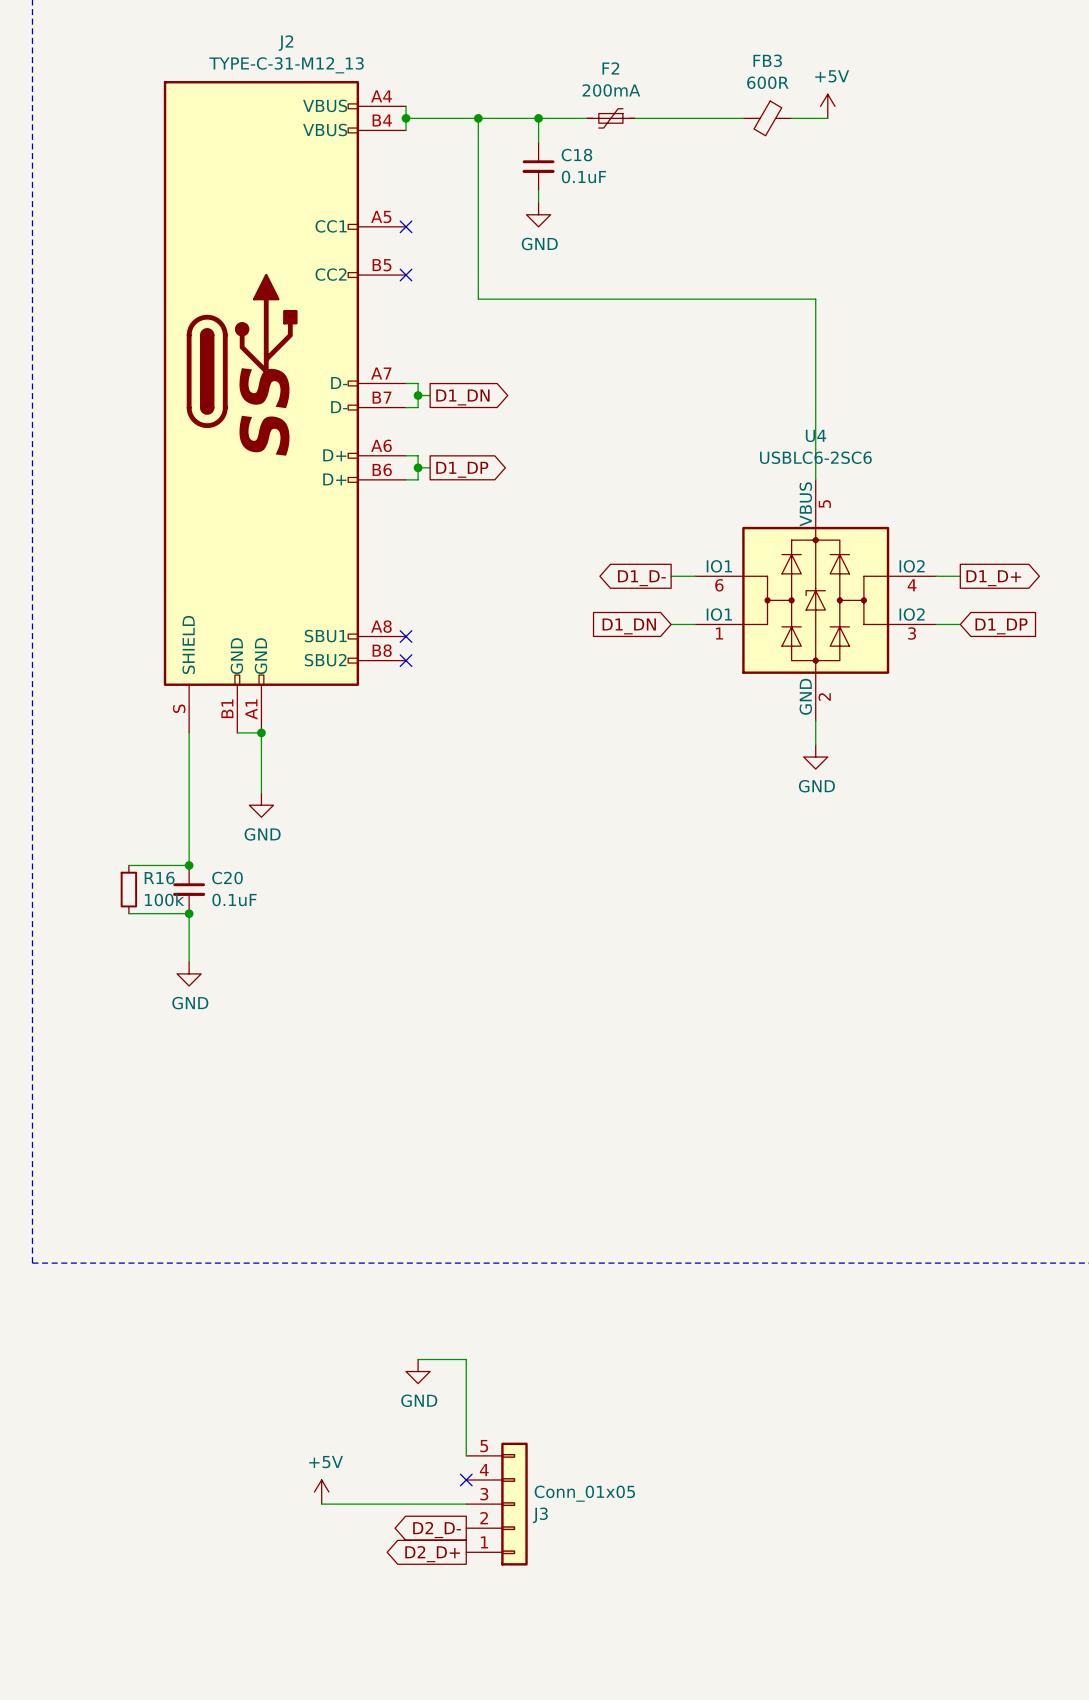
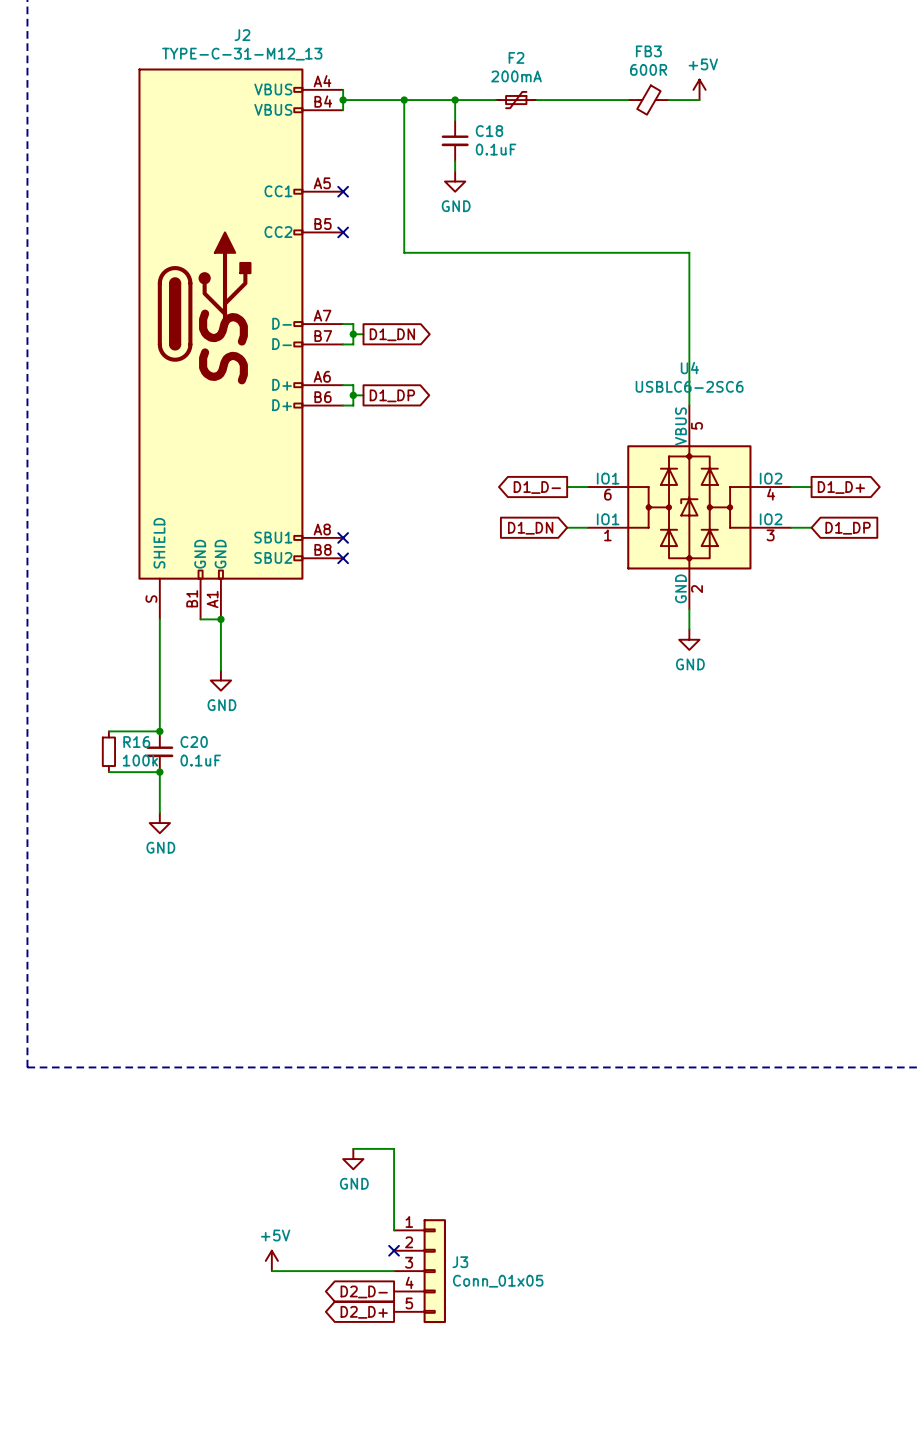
J3 flip: as is (514, 1504) -> up-down (434, 1271)

